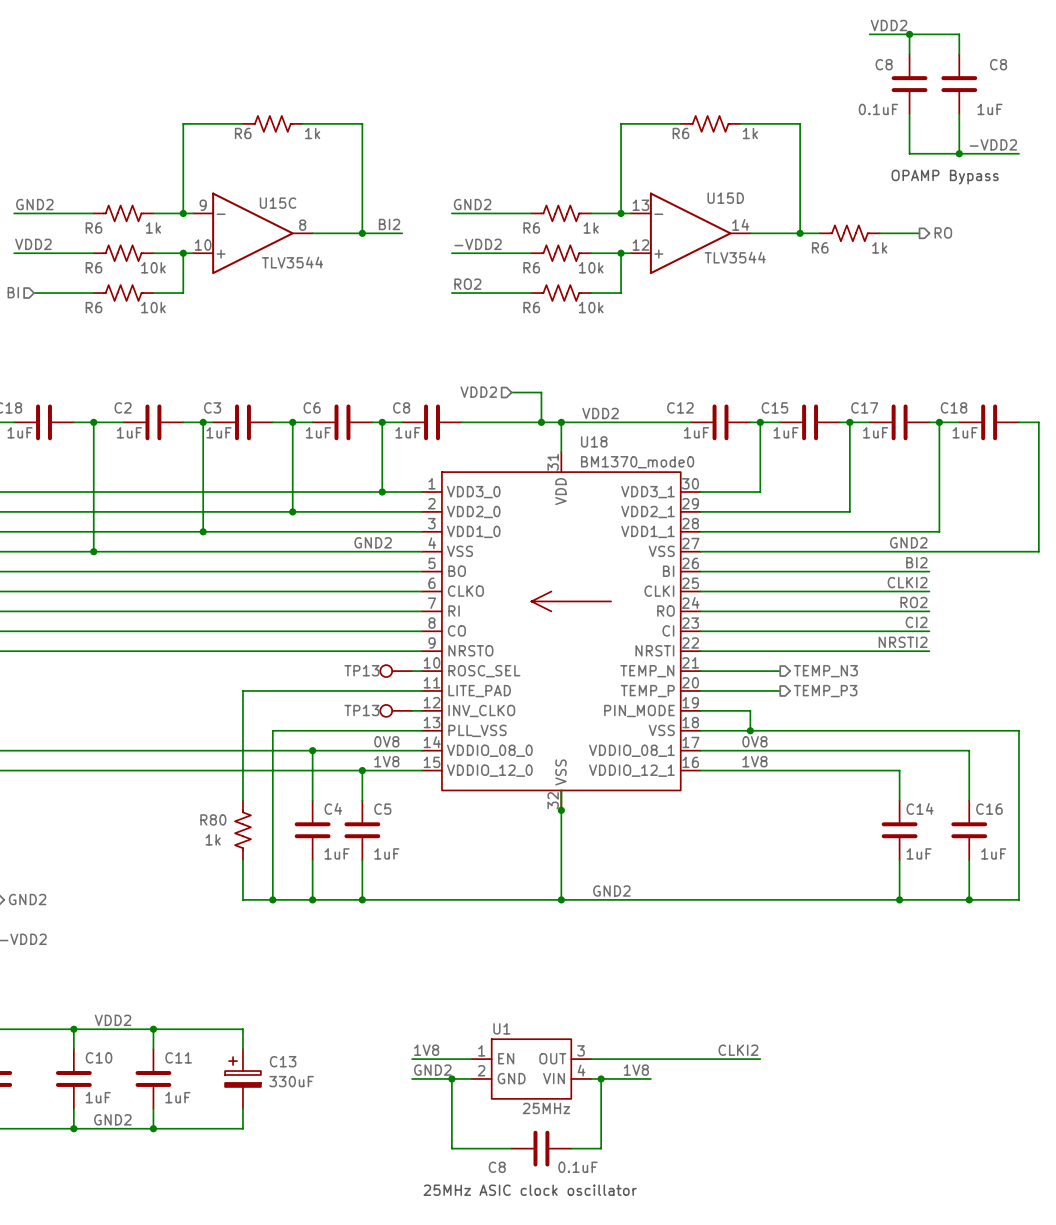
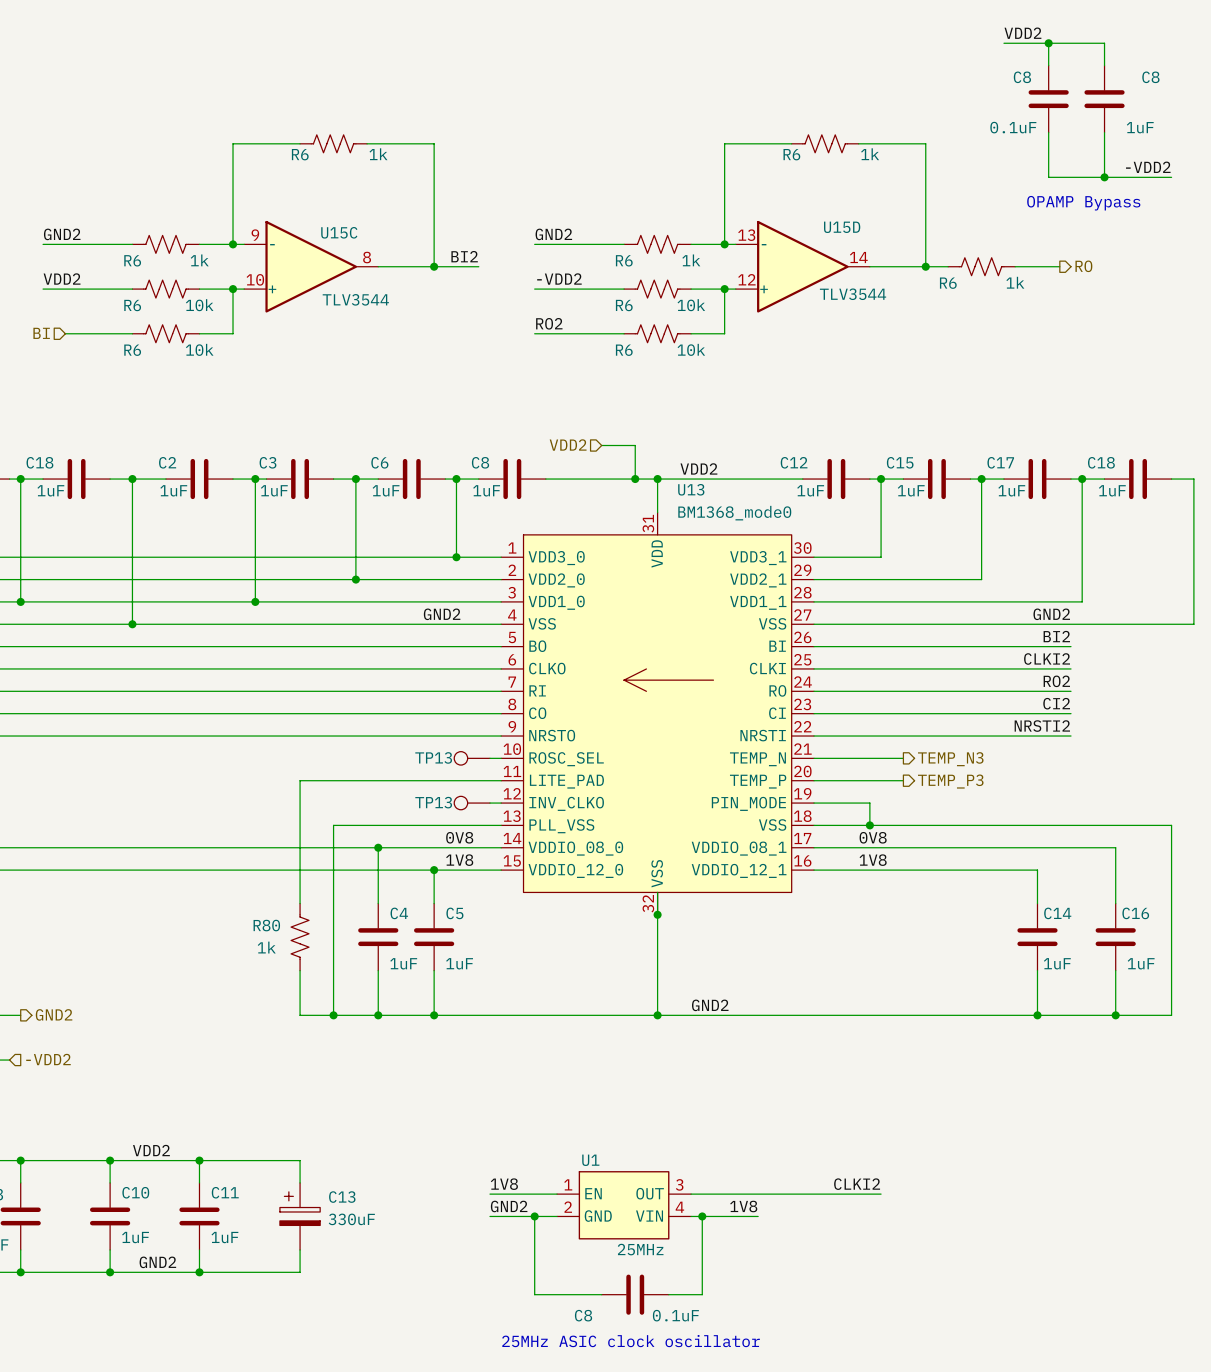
U18 name: U18 (594, 441) -> U13 (691, 489)
U18 value: BM1370_mode0 (637, 462) -> BM1368_mode0 (734, 513)

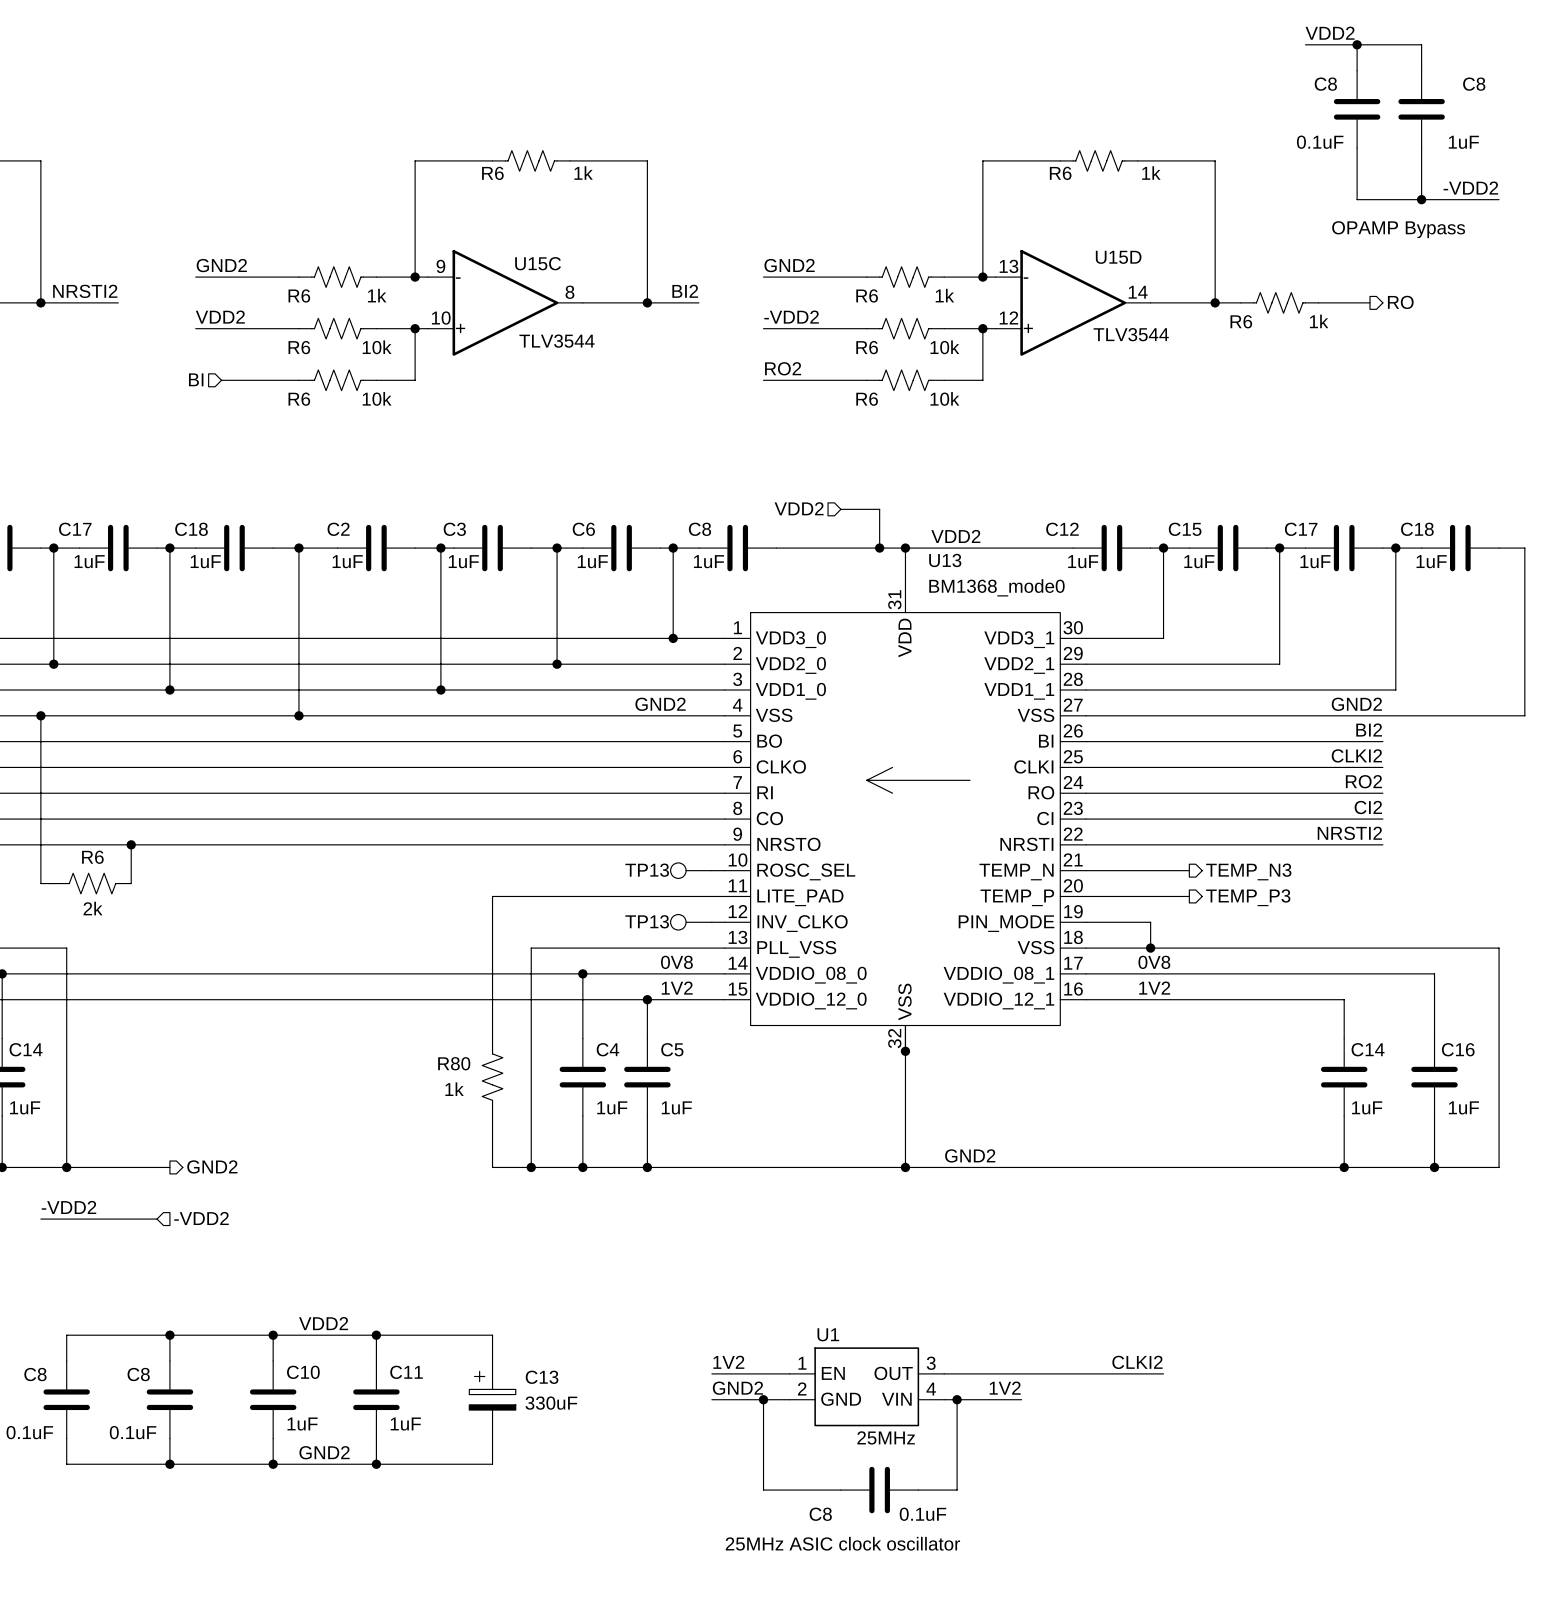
label: 1V8 (459, 860) -> 1V2 (677, 988)
label: 1V8 (873, 860) -> 1V2 (1154, 988)
label: 1V8 (504, 1184) -> 1V2 (728, 1362)
label: 1V8 (743, 1206) -> 1V2 (1005, 1388)

